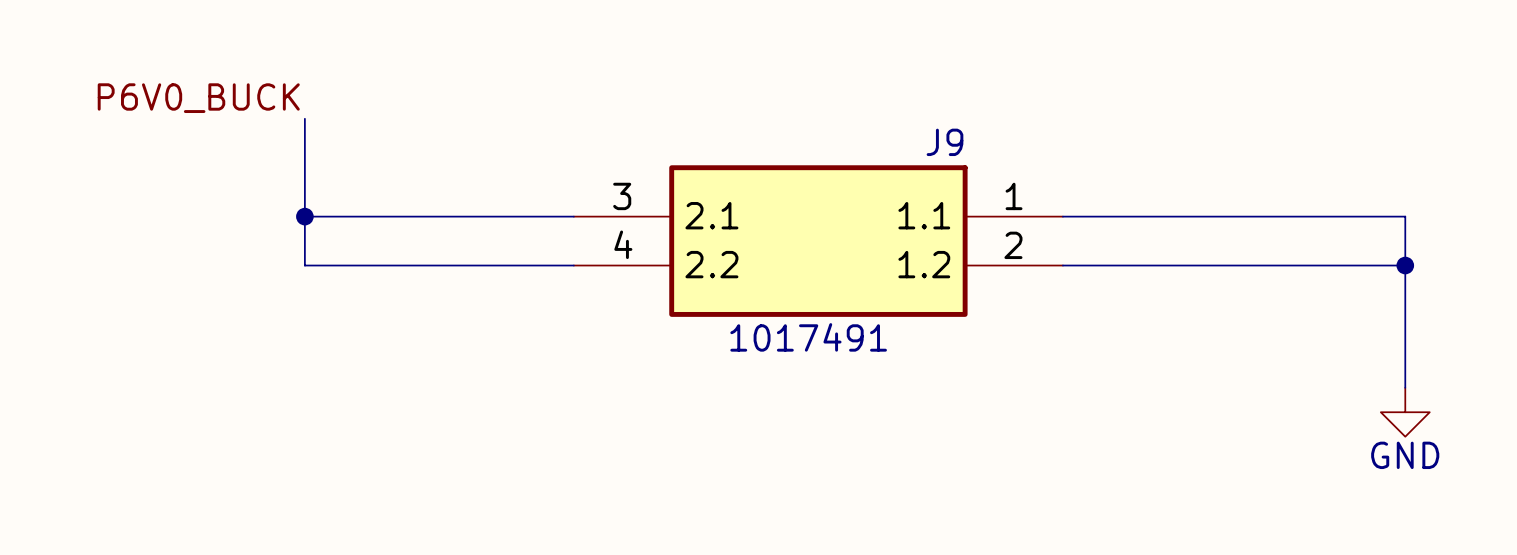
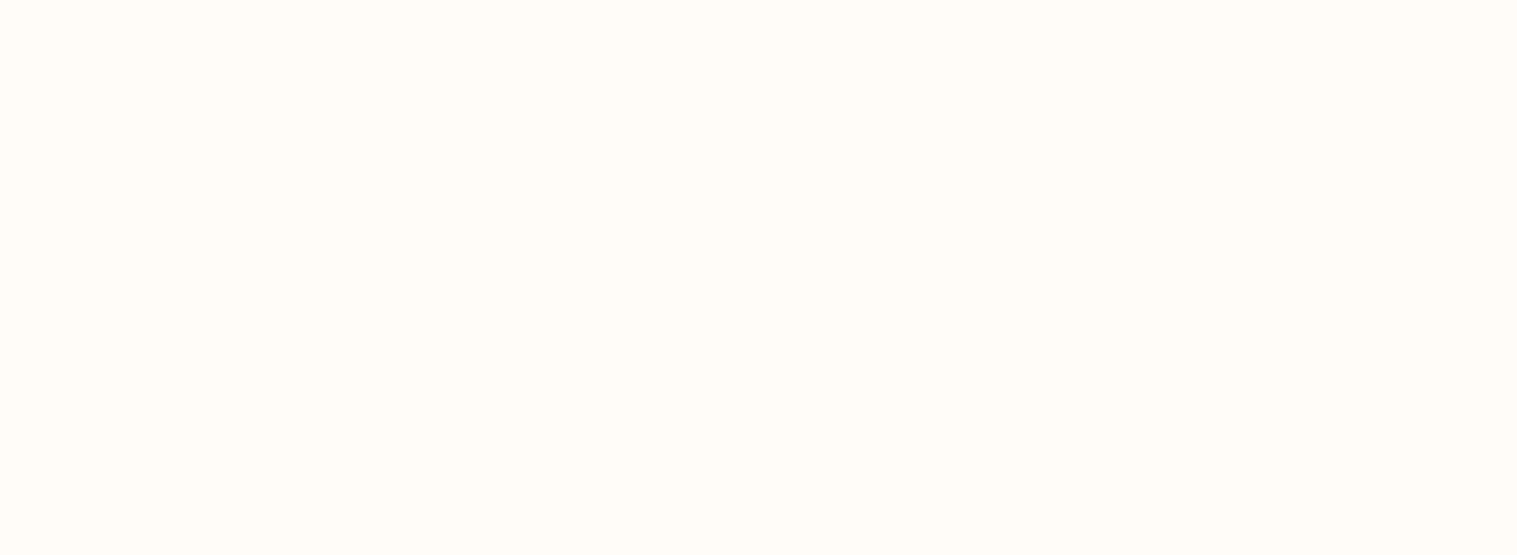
label: P6V0_BUCK (198, 98) -> none
wire: (304, 118) (304, 265) (573, 265) -> none
wire: (304, 216) (573, 216) -> none
junction: (304, 216) -> none
wire: (1062, 216) (1405, 216) (1405, 387) -> none
J9: 1017491 (818, 241) -> none
wire: (1062, 265) (1405, 265) -> none
junction: (1405, 265) -> none
power symbol: GND (1405, 412) -> none

